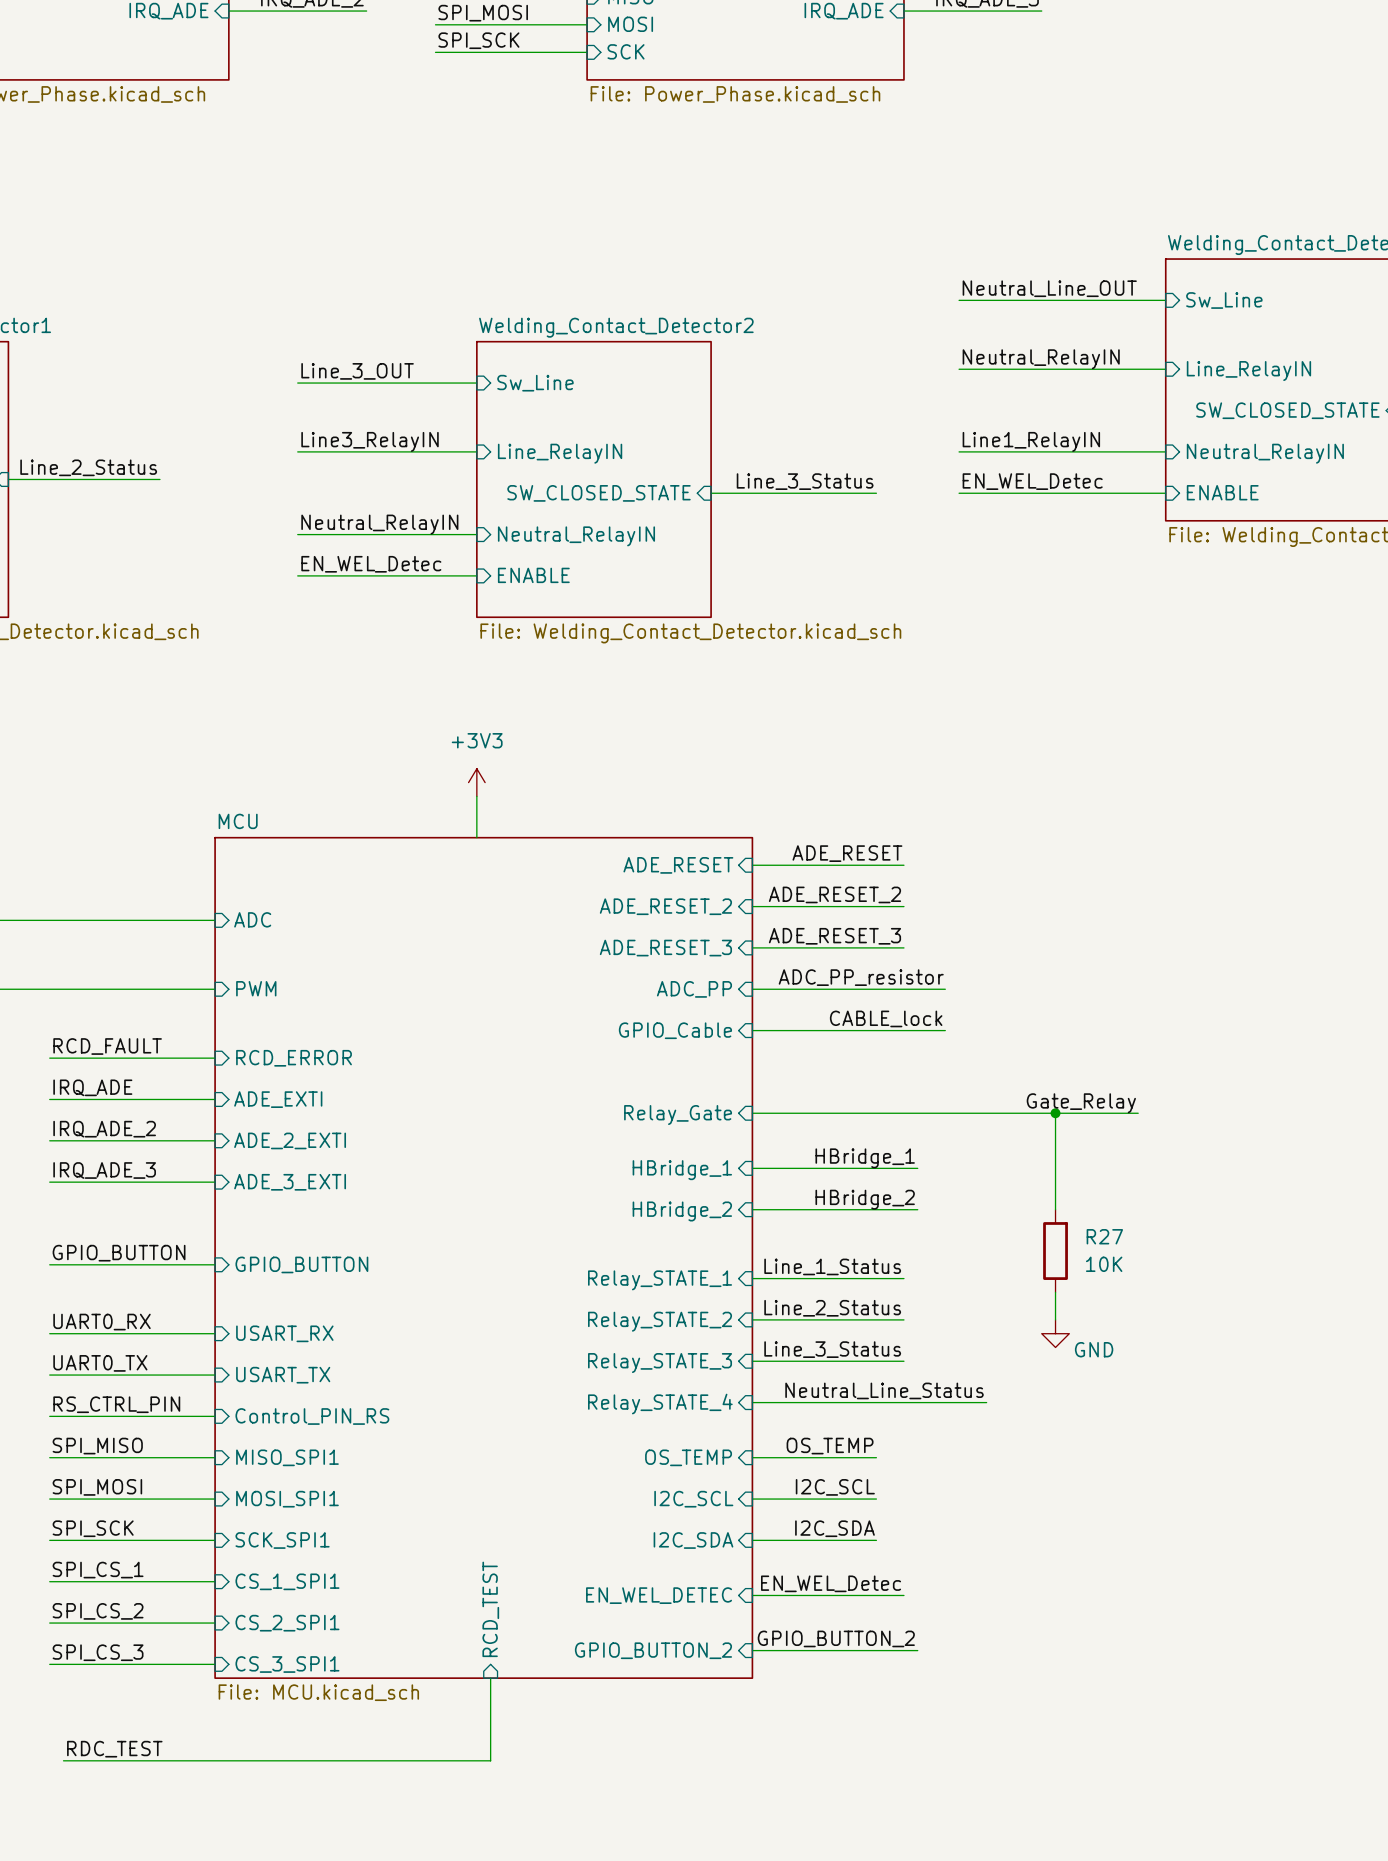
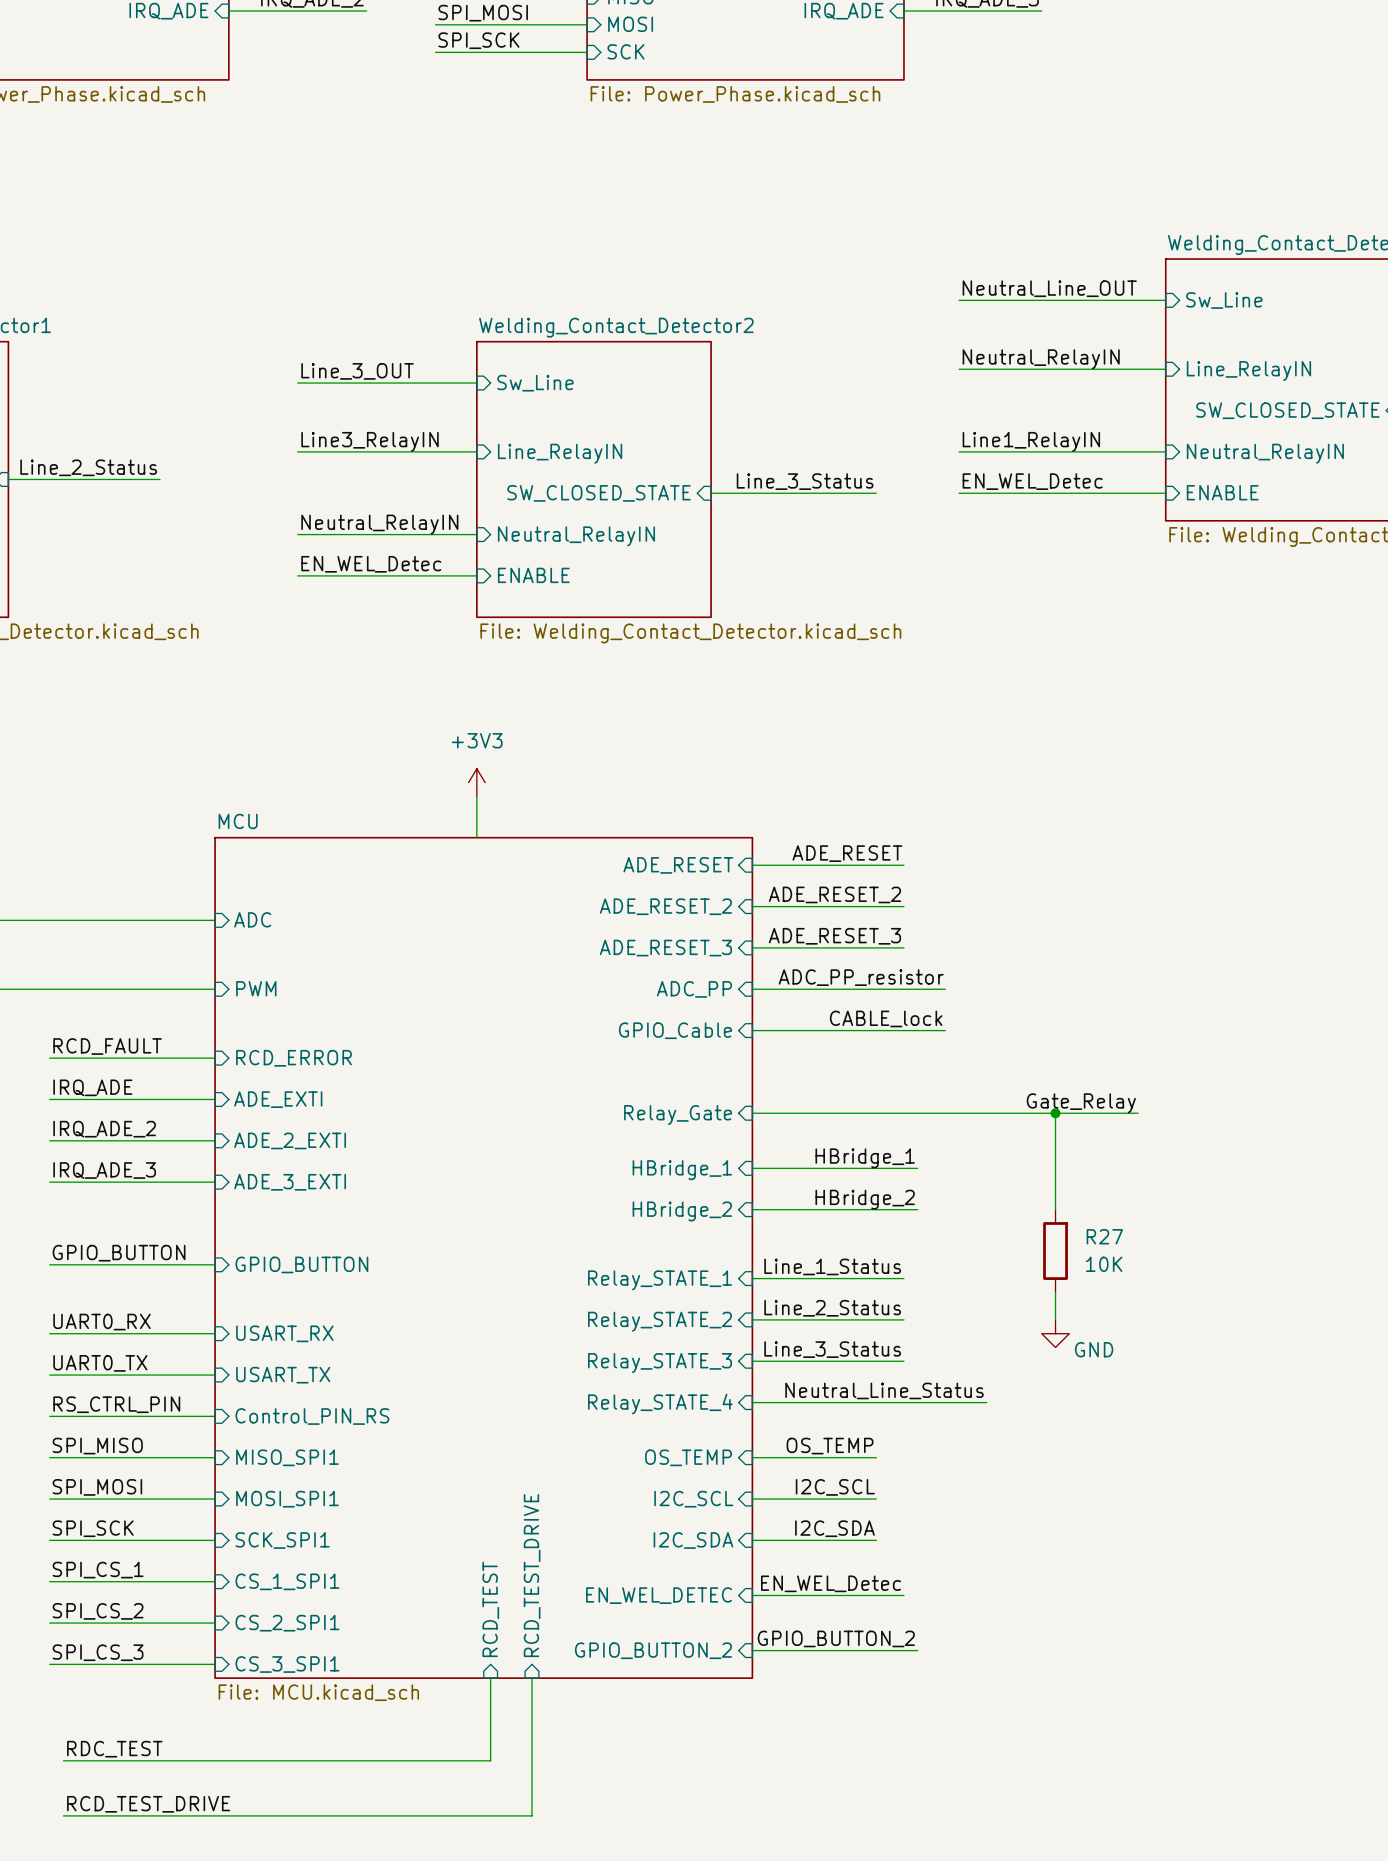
sheet pin: none -> RCD_TEST_DRIVE (532, 1575)
wire: none -> (531, 1678) (531, 1815) (63, 1815)
label: none -> RCD_TEST_DRIVE (148, 1804)

